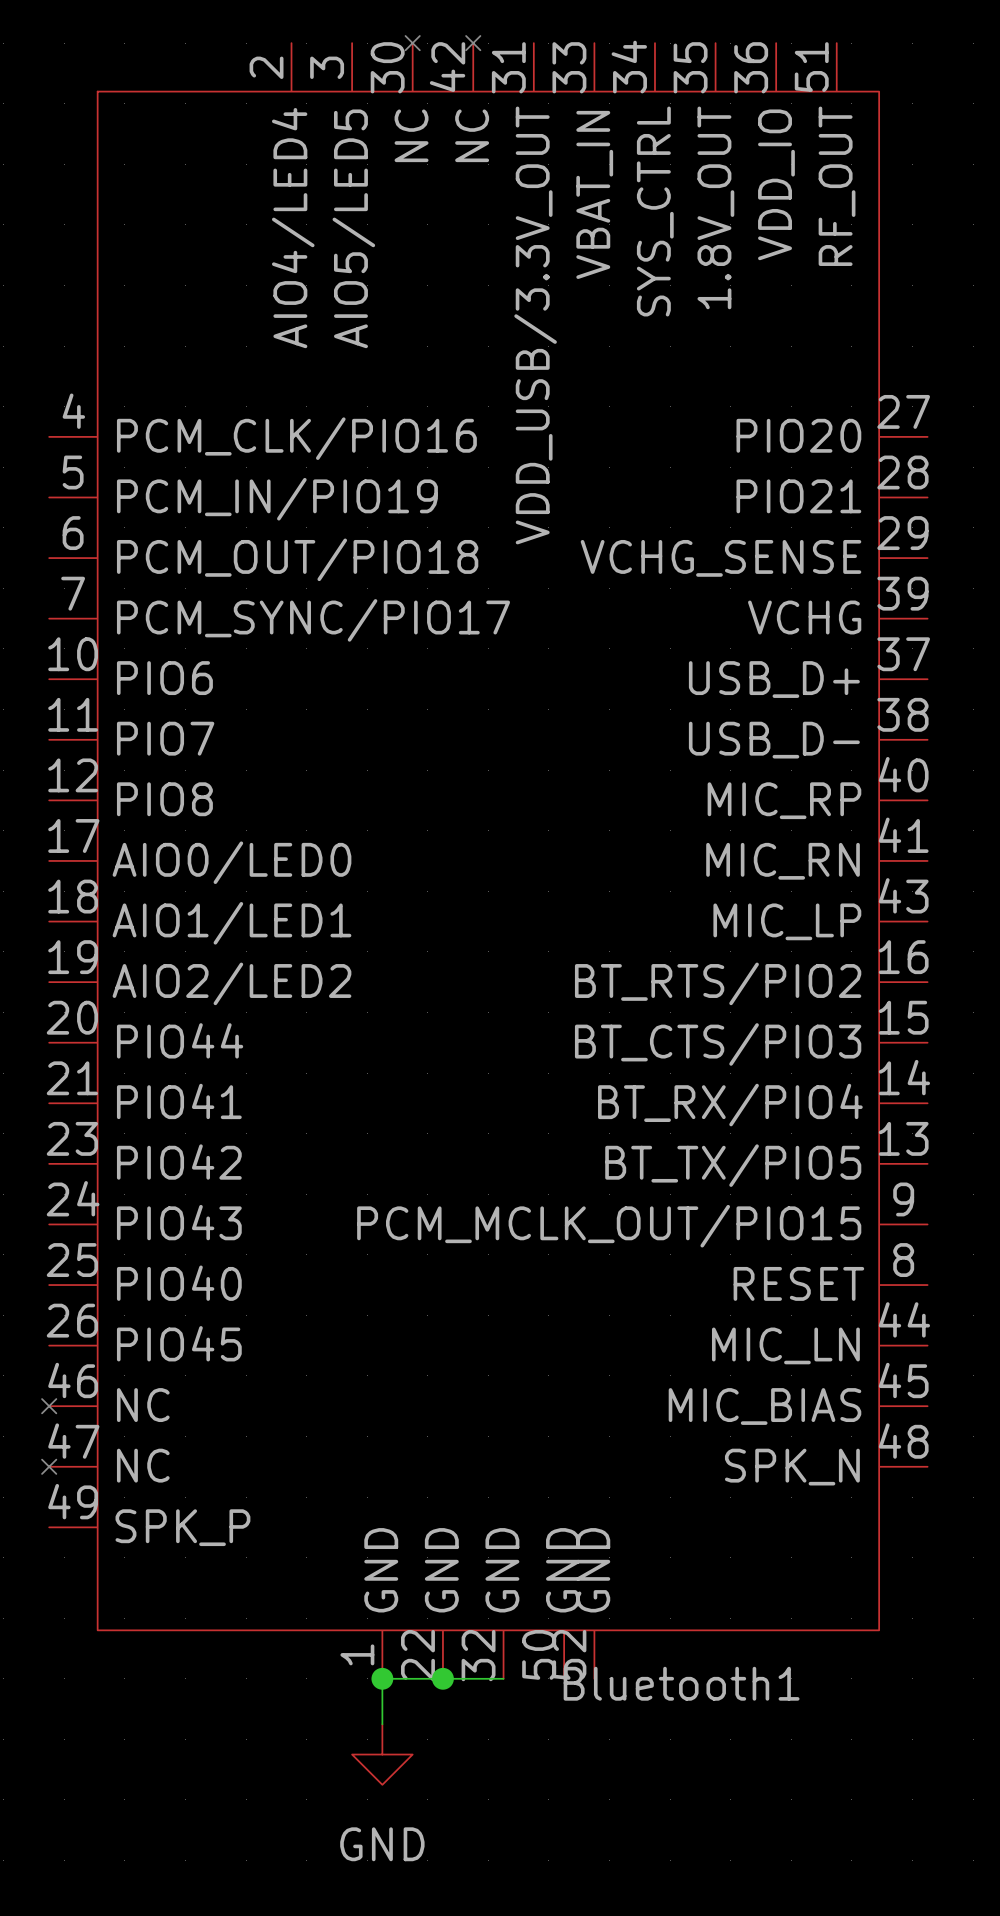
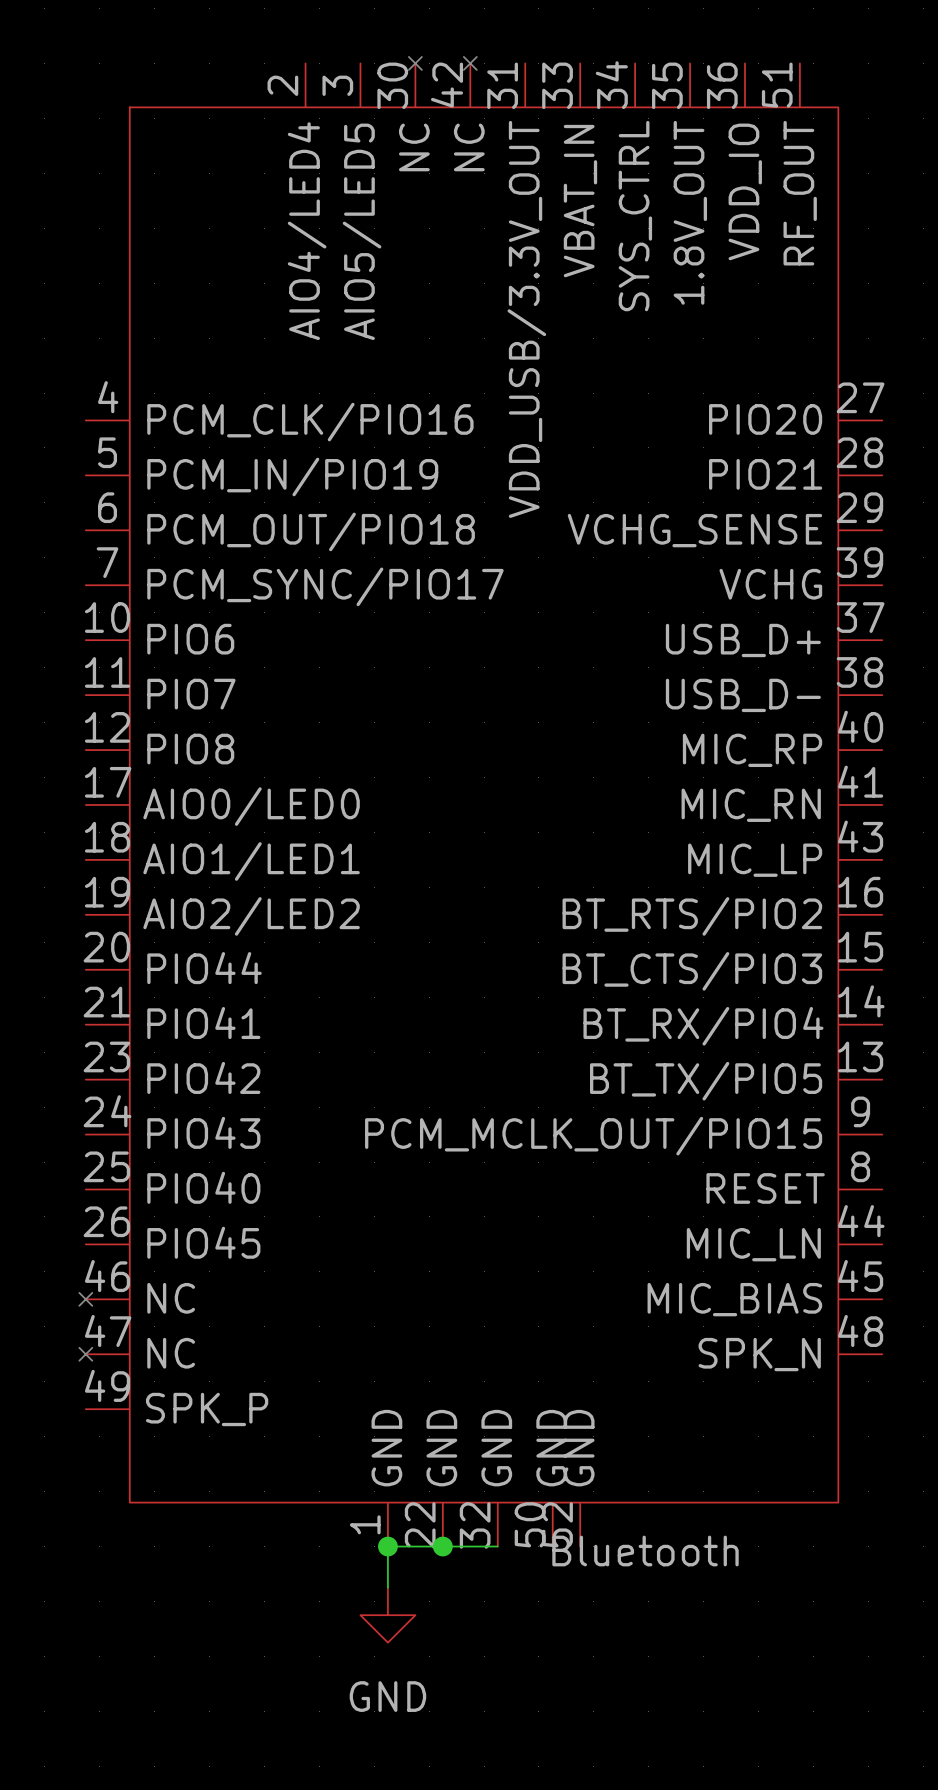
Bluetooth1 name: Bluetooth1 (681, 1683) -> Bluetooth (645, 1551)

